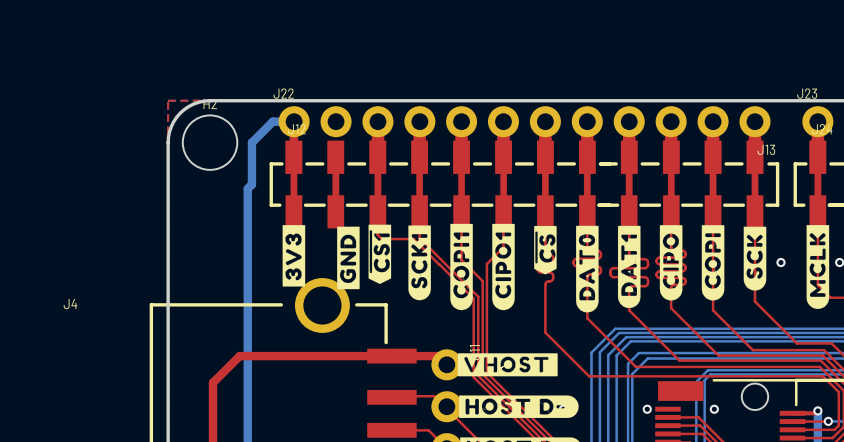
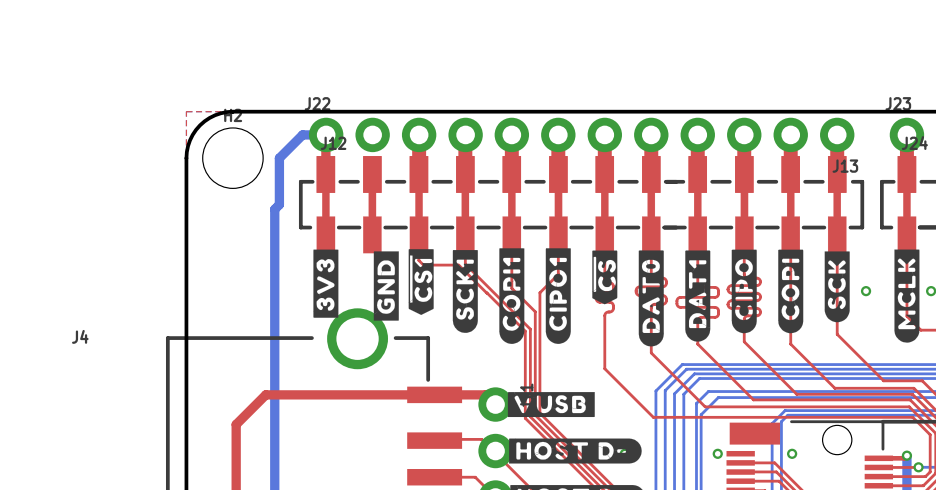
drawing shape: [457, 353, 558, 377] -> [507, 392, 595, 418]

